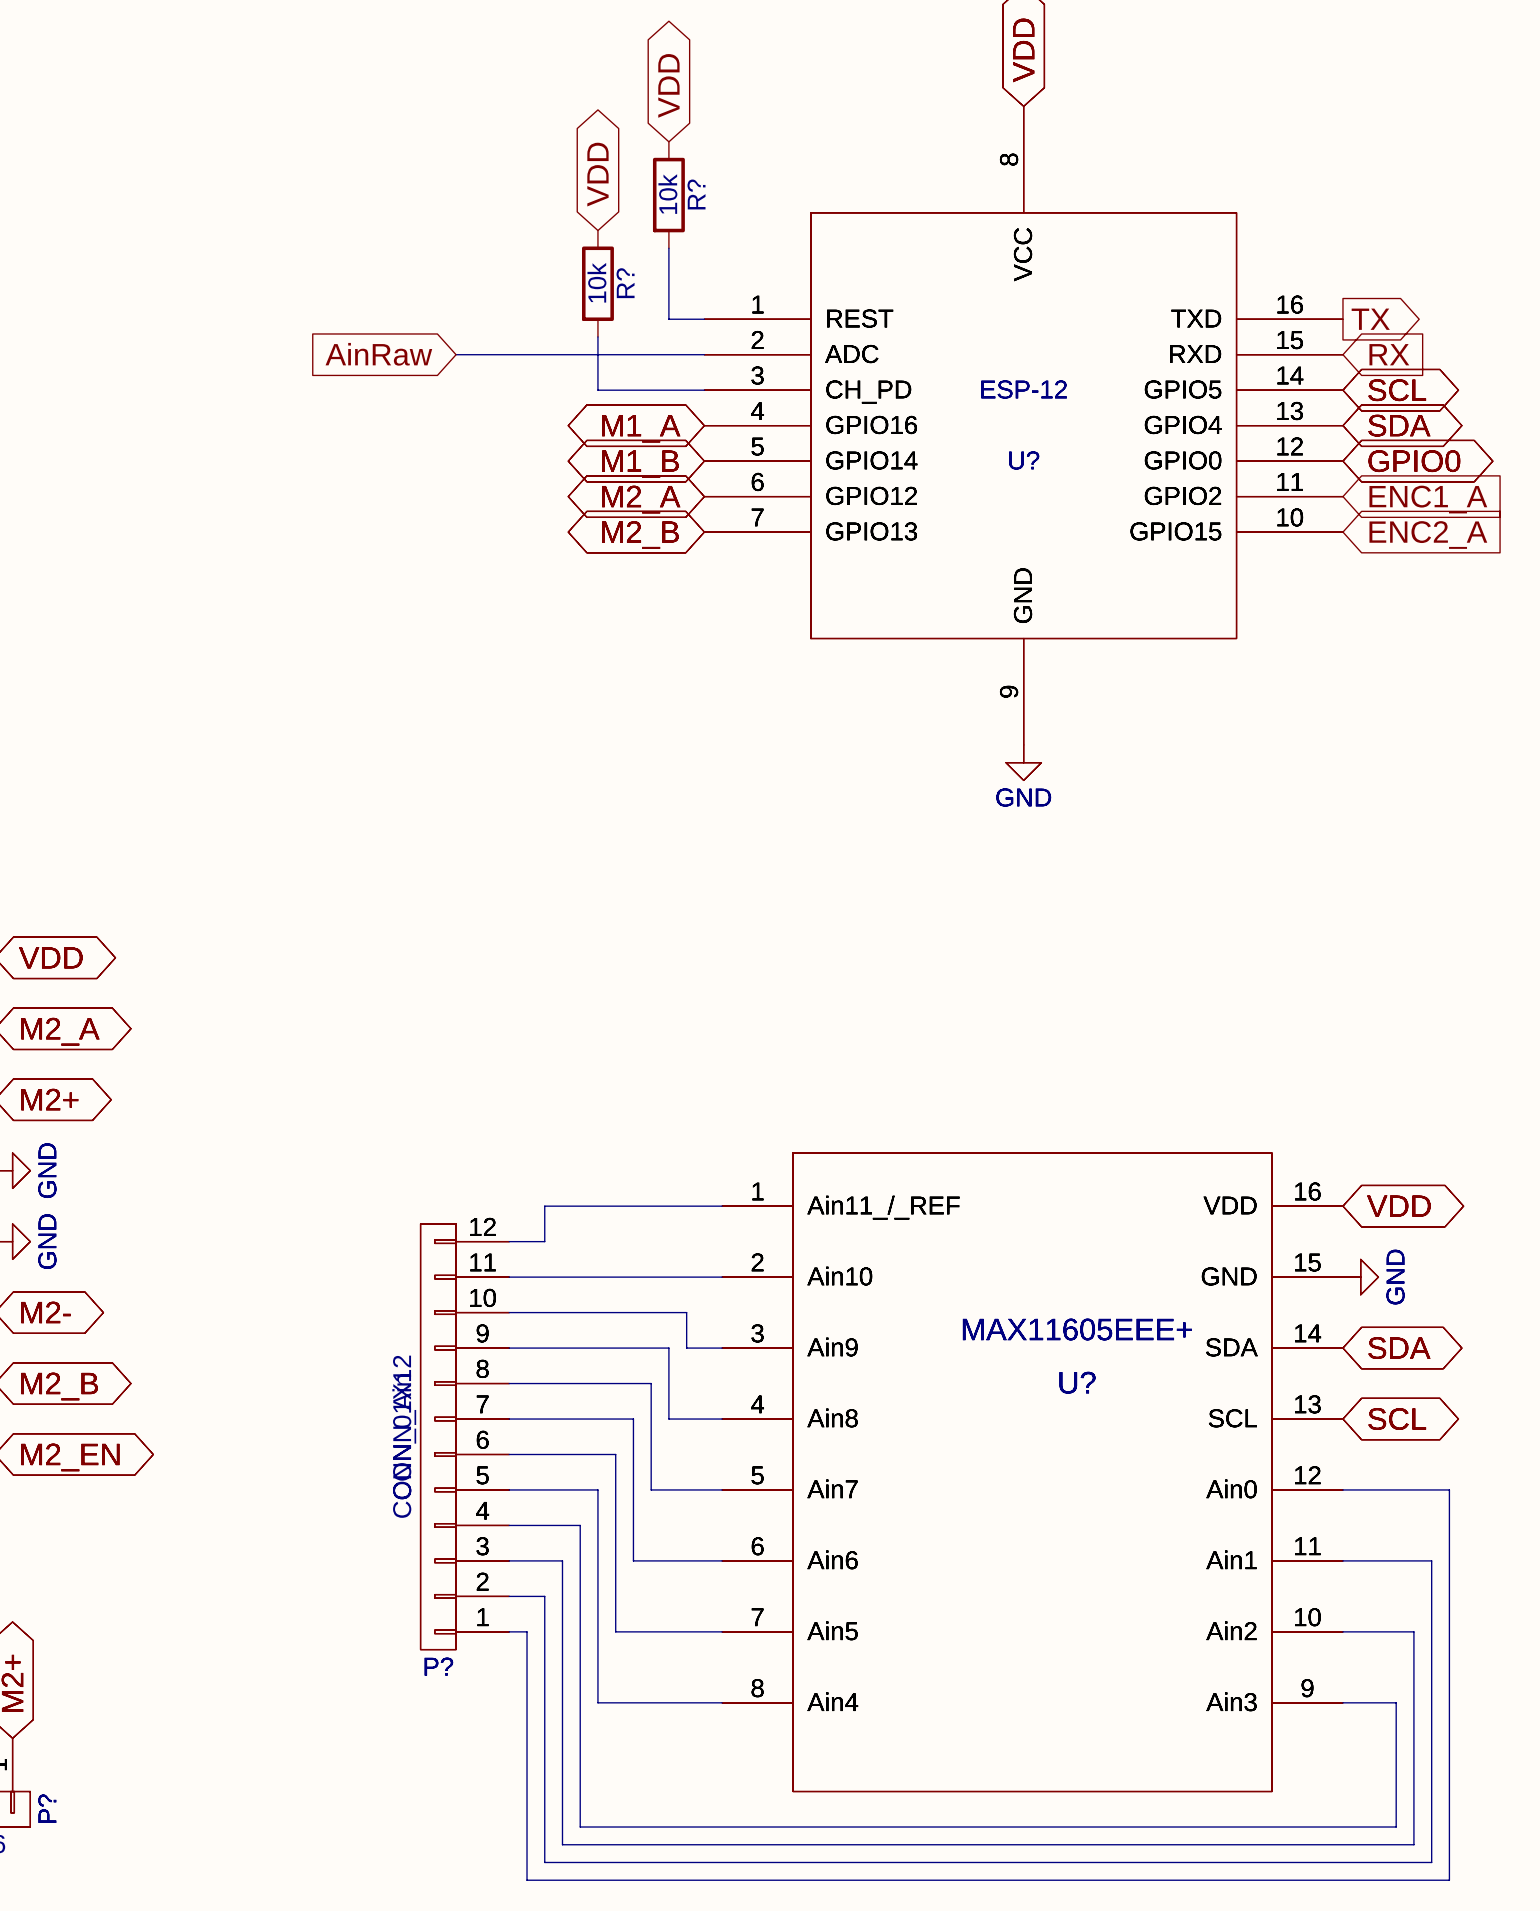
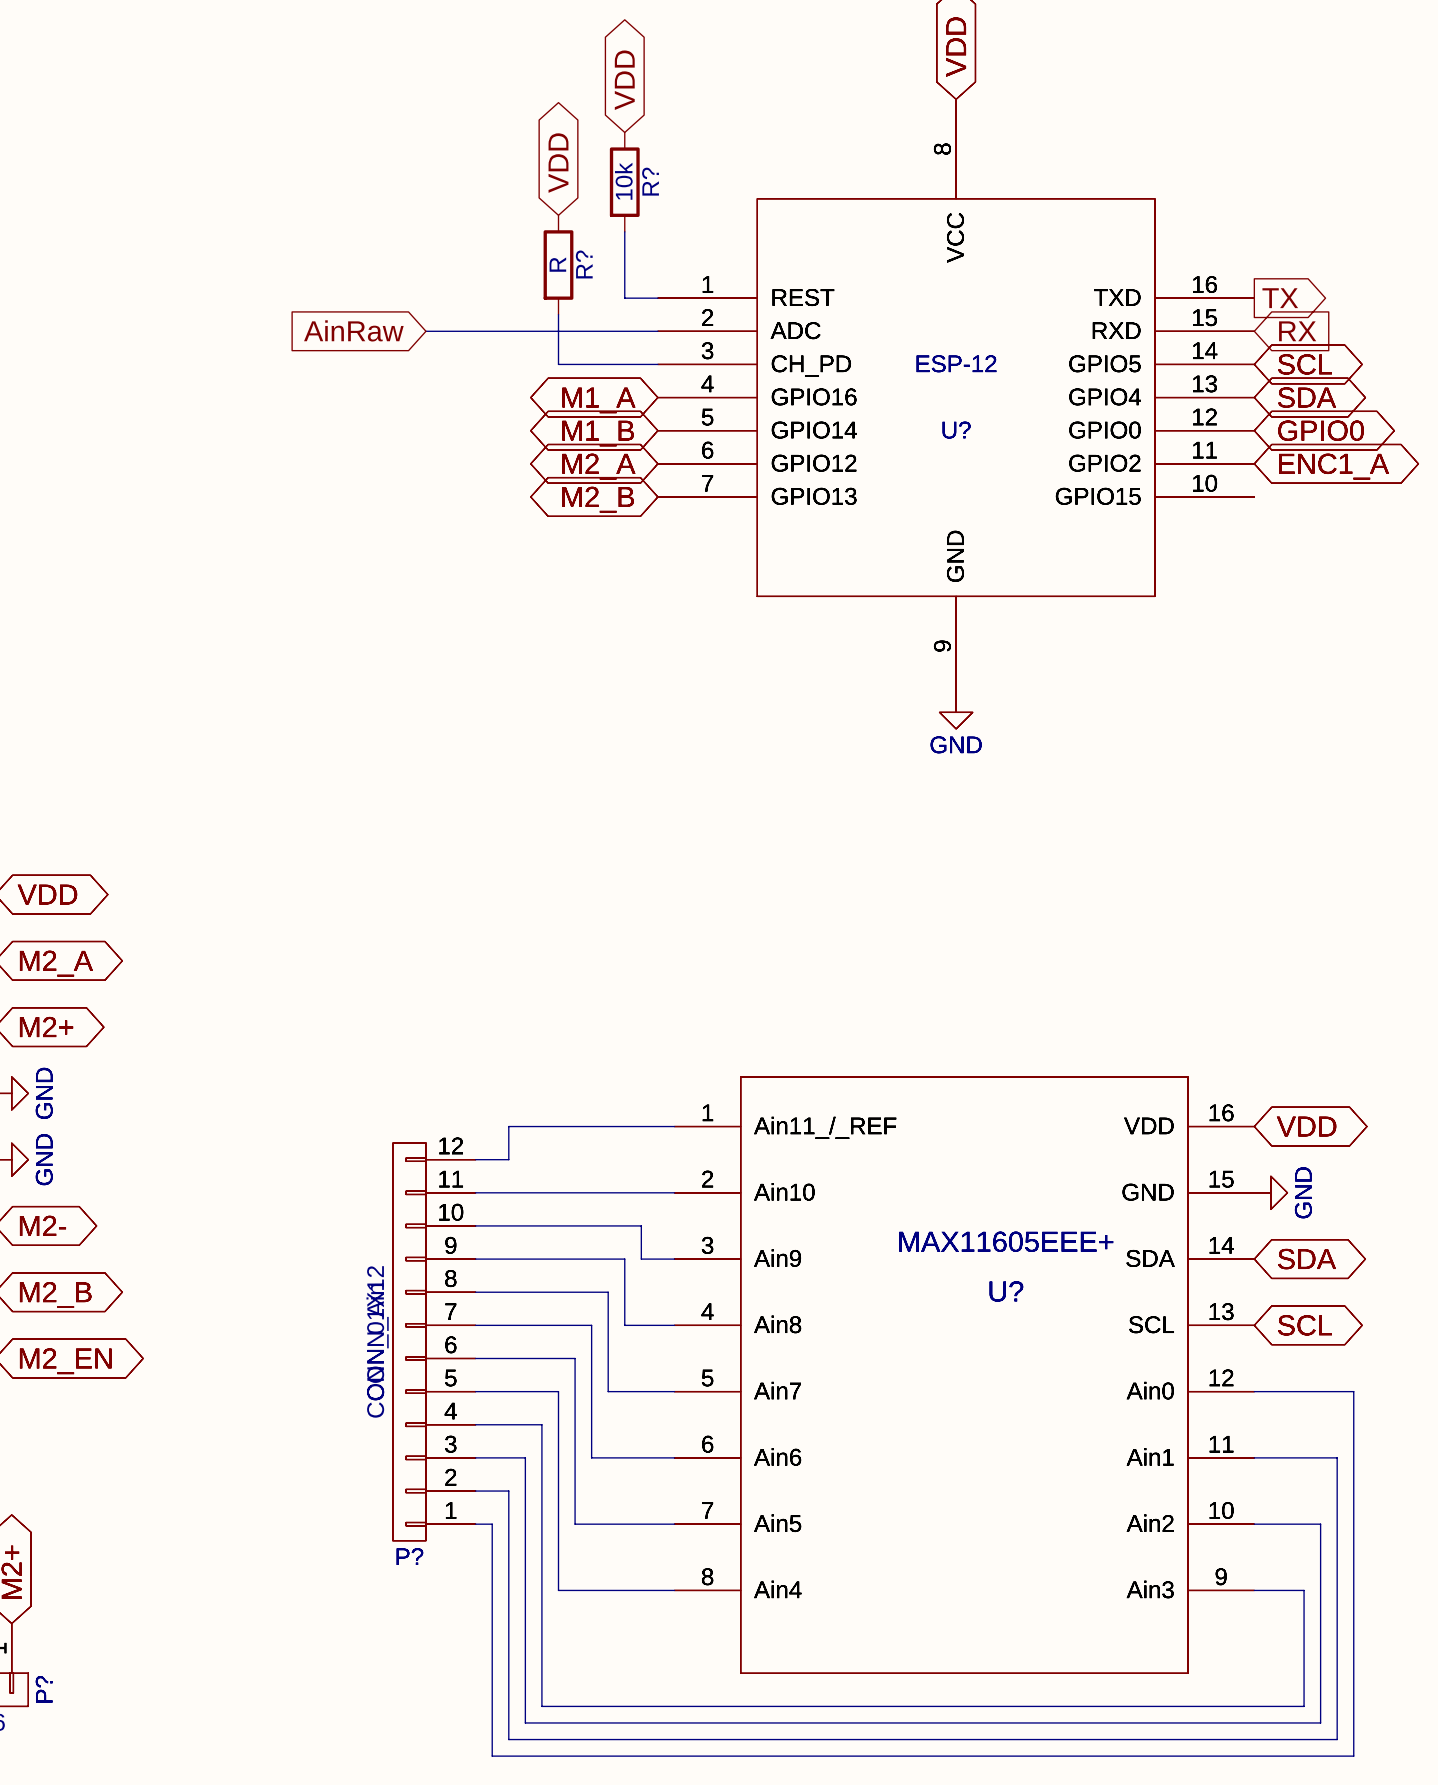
R? value: 10k (596, 282) -> R (557, 264)
global label shape: input (1428, 499) -> bidirectional (1334, 466)
global label: ENC2_A (1428, 535) -> none

